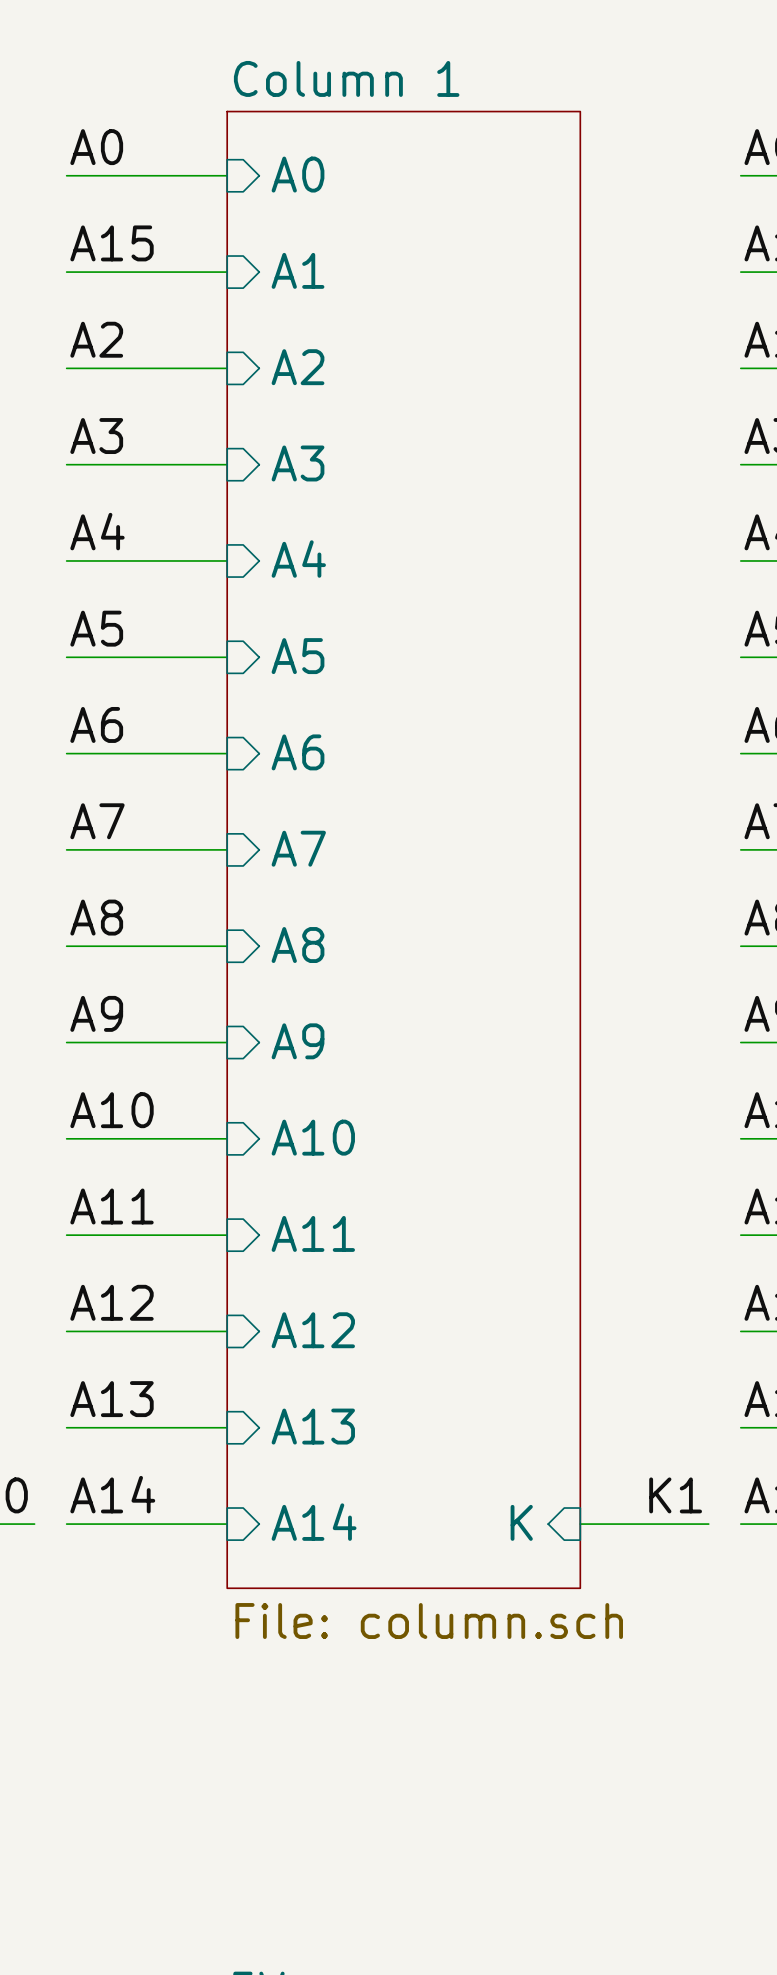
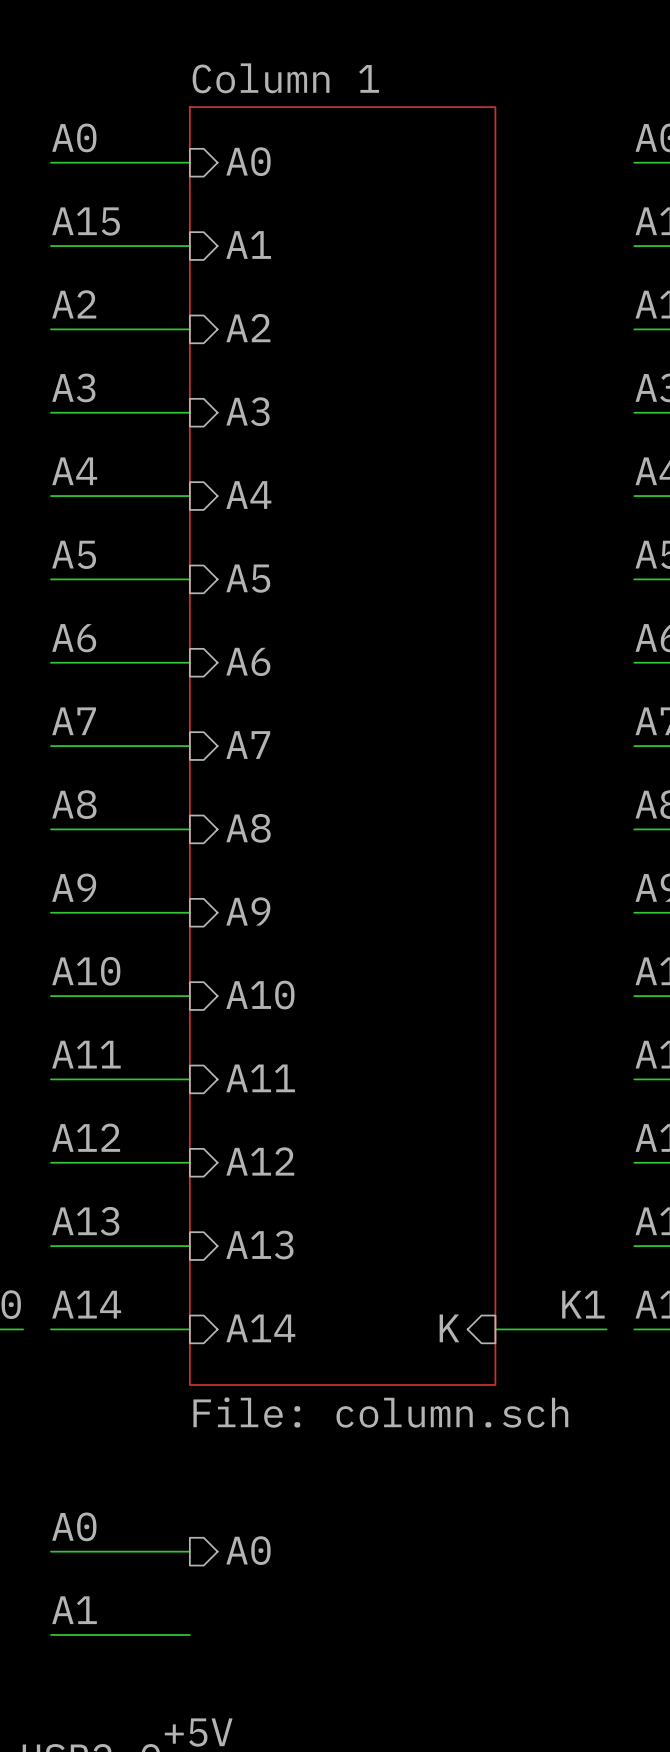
label: none -> A0 (74, 1526)
sheet pin: none -> A0 (248, 1550)
wire: none -> (50, 1551) (189, 1551)
label: none -> A1 (74, 1610)
wire: none -> (50, 1634) (189, 1634)

